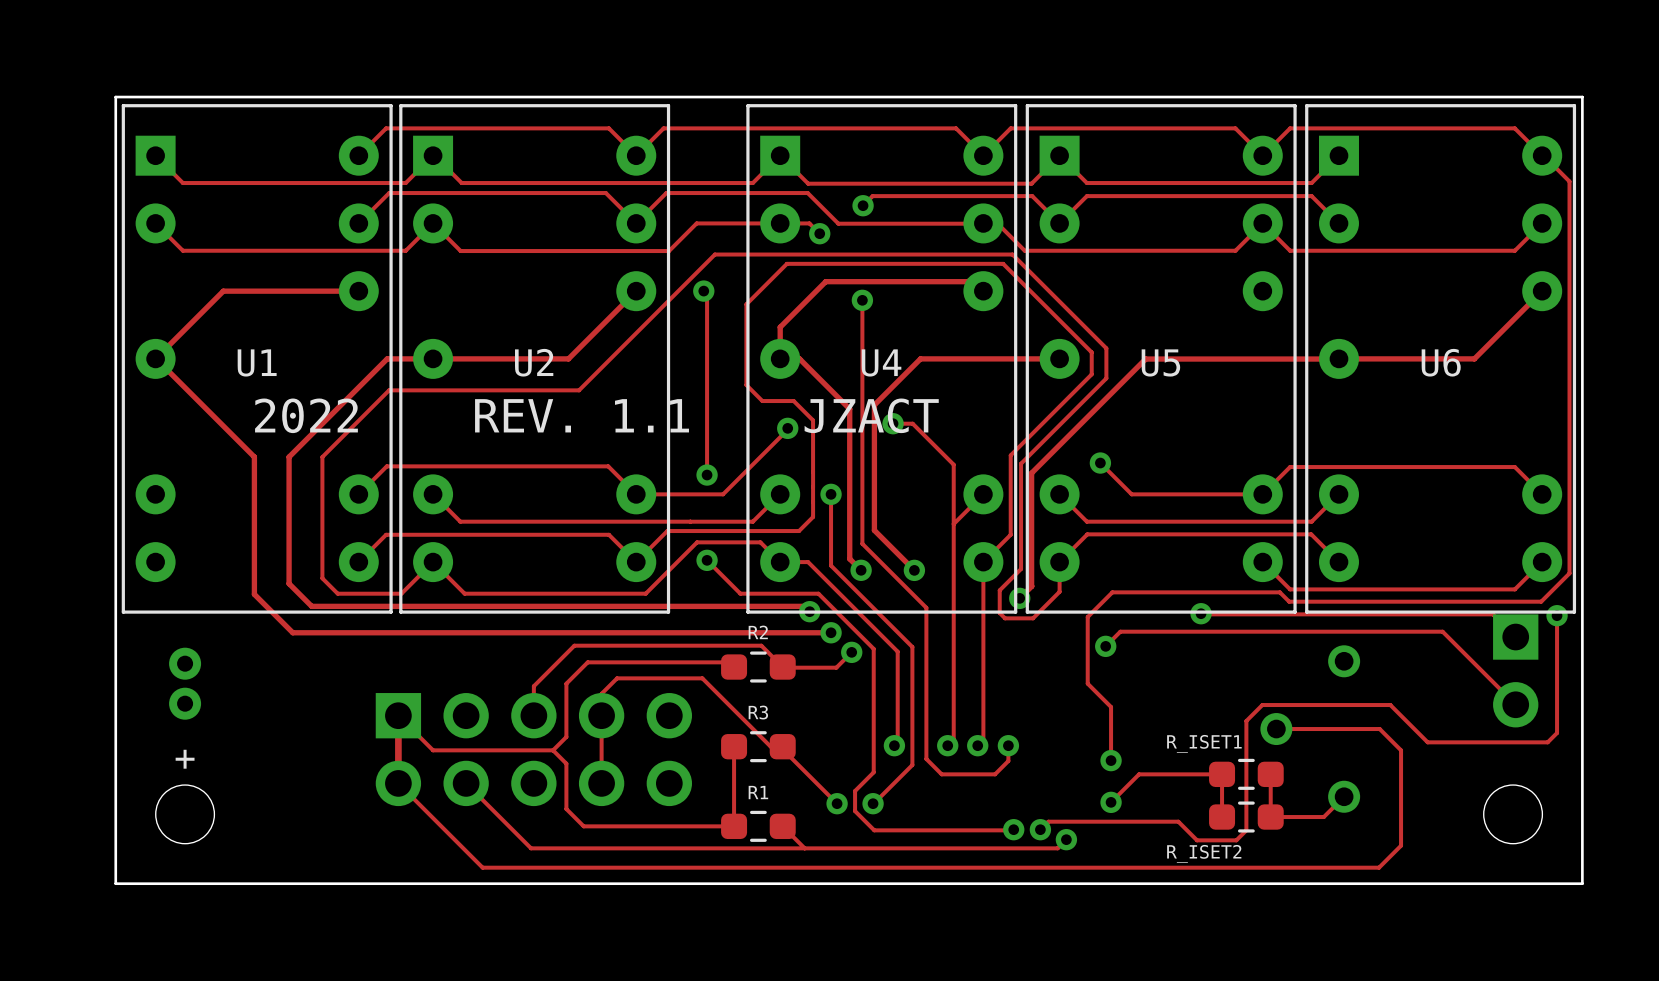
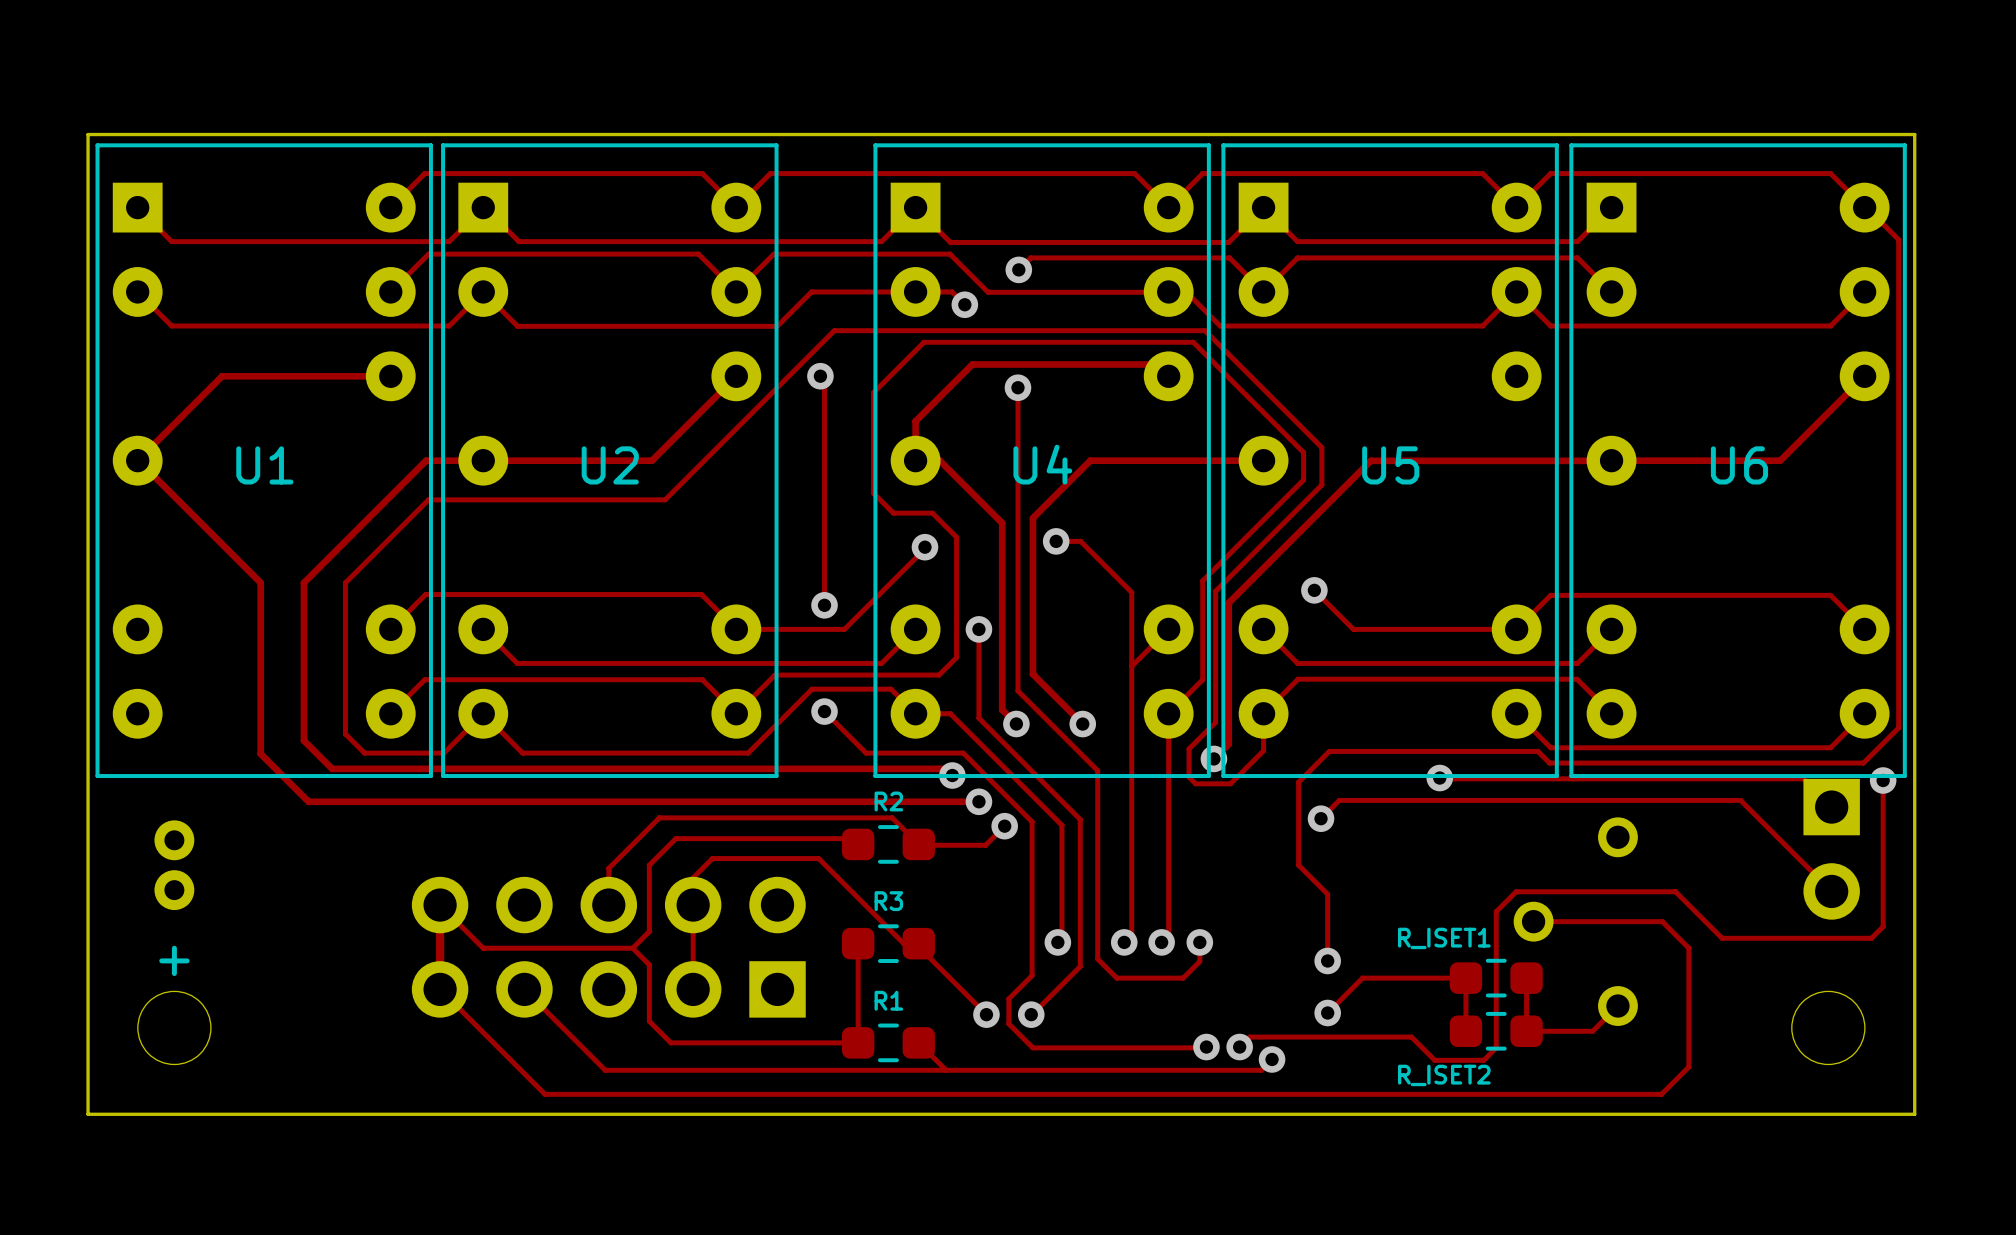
text: 2022 REV. 1.1 JZACT (596, 415) -> none
part rotation: 0° (533, 749) -> 180° (608, 947)

